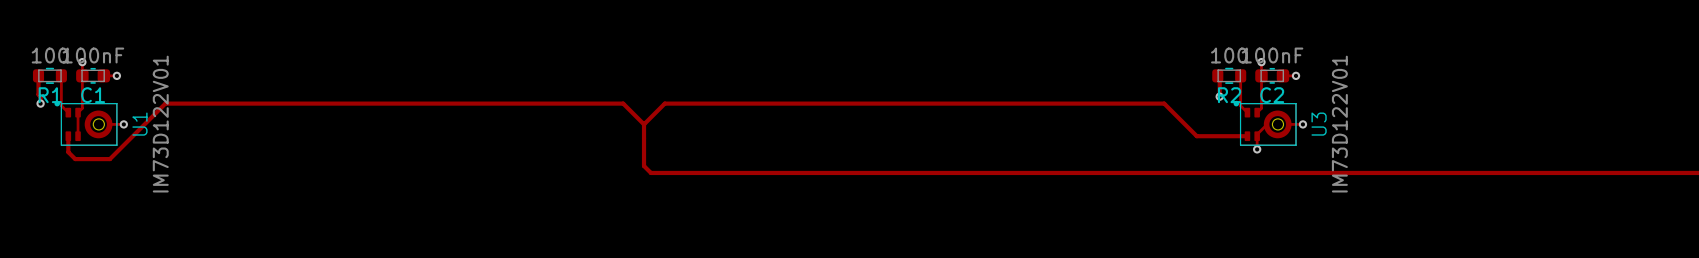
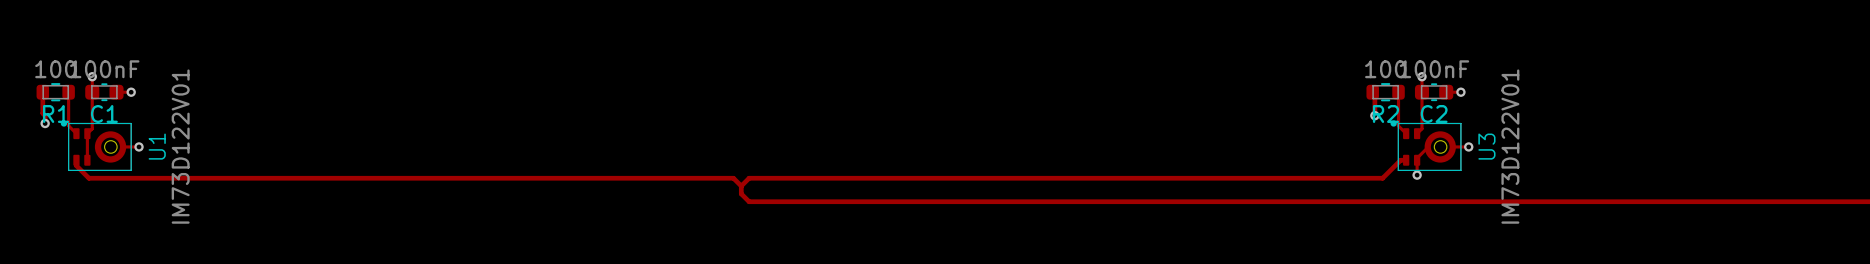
track: (644, 124) (644, 166) (650, 172) (664, 172) -> (741, 186) (741, 193) (749, 201)
track: (644, 124) (664, 103) (1164, 103) (1196, 136) (1242, 136) -> (741, 186) (749, 178) (1382, 178) (1400, 160)
track: (644, 124) (623, 103) (165, 103) (109, 159) (75, 159) (68, 152) (68, 141) -> (741, 186) (733, 178) (88, 178) (76, 165)

